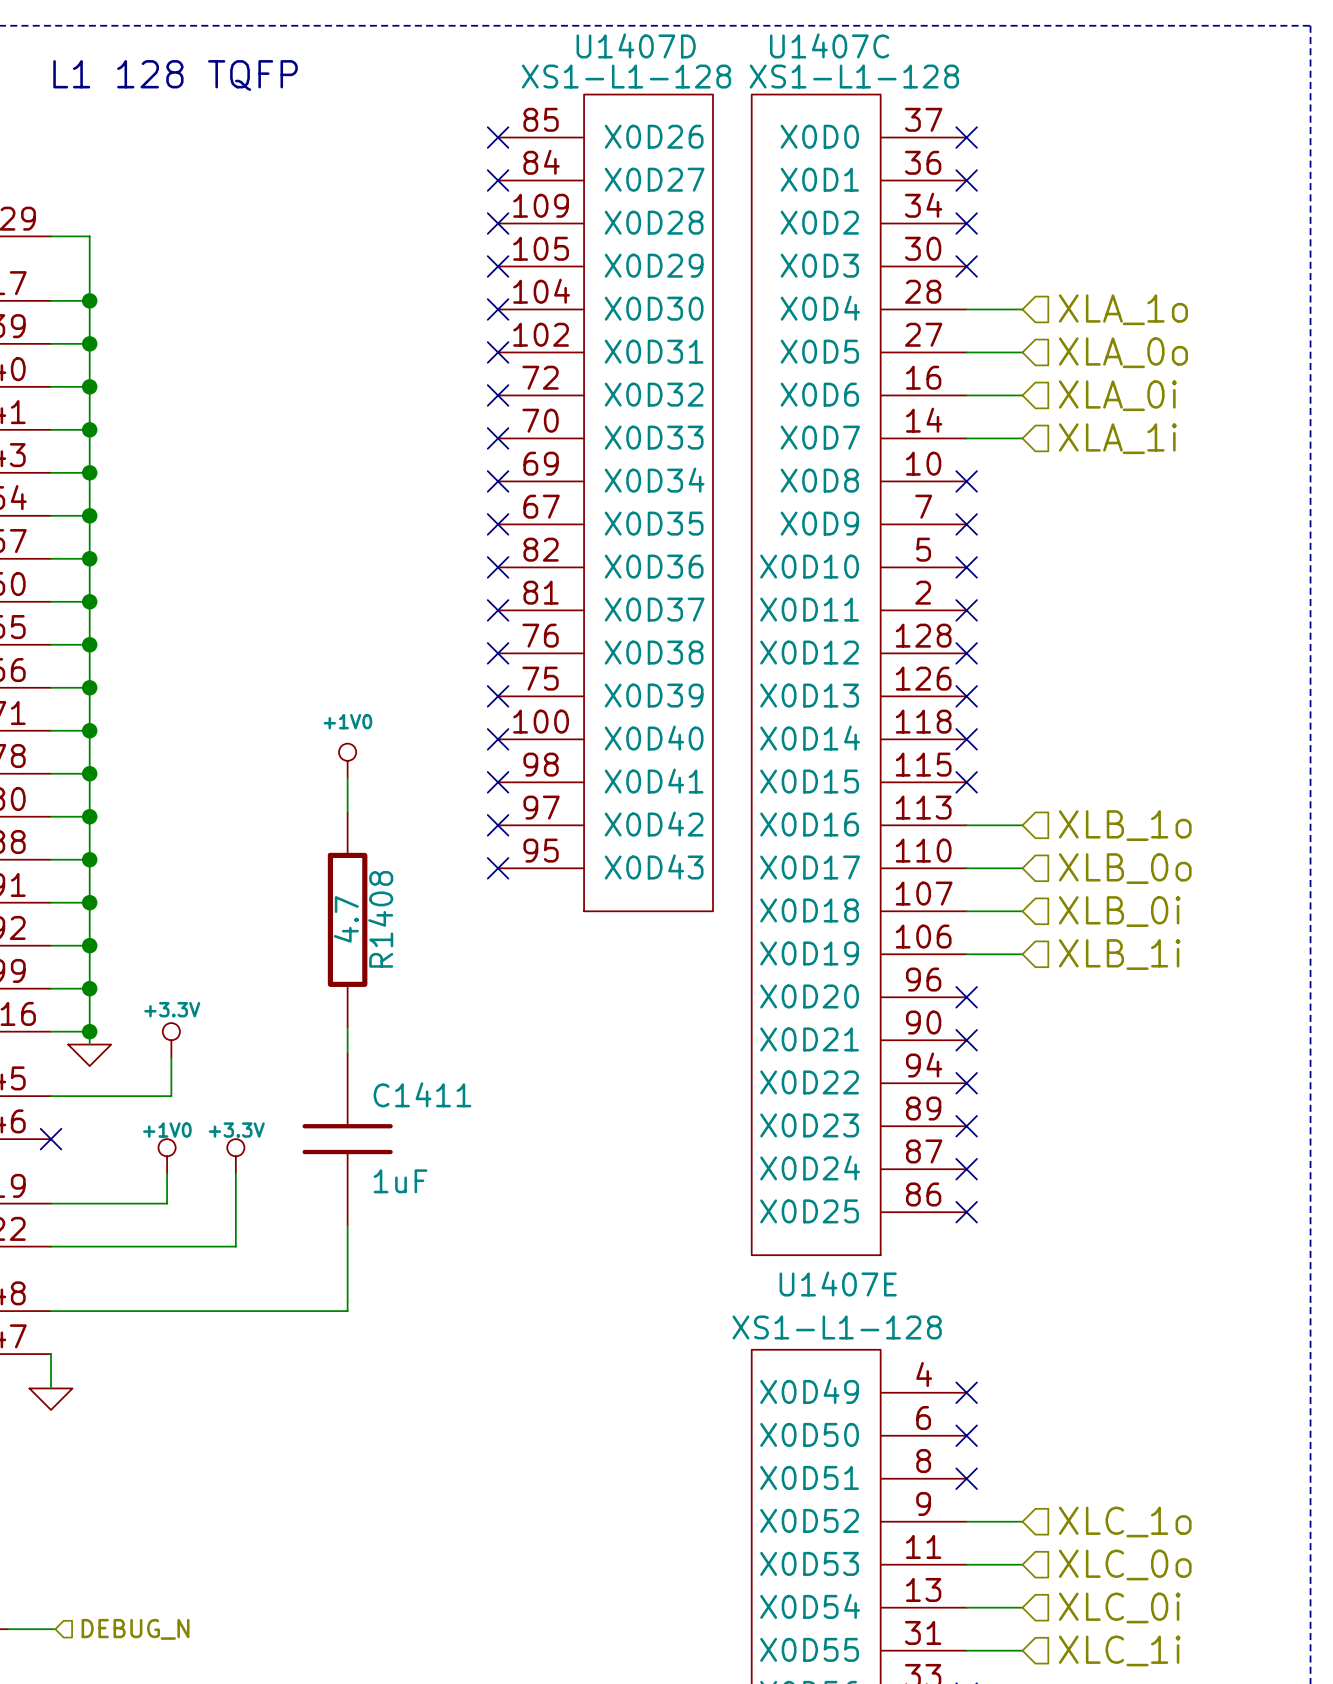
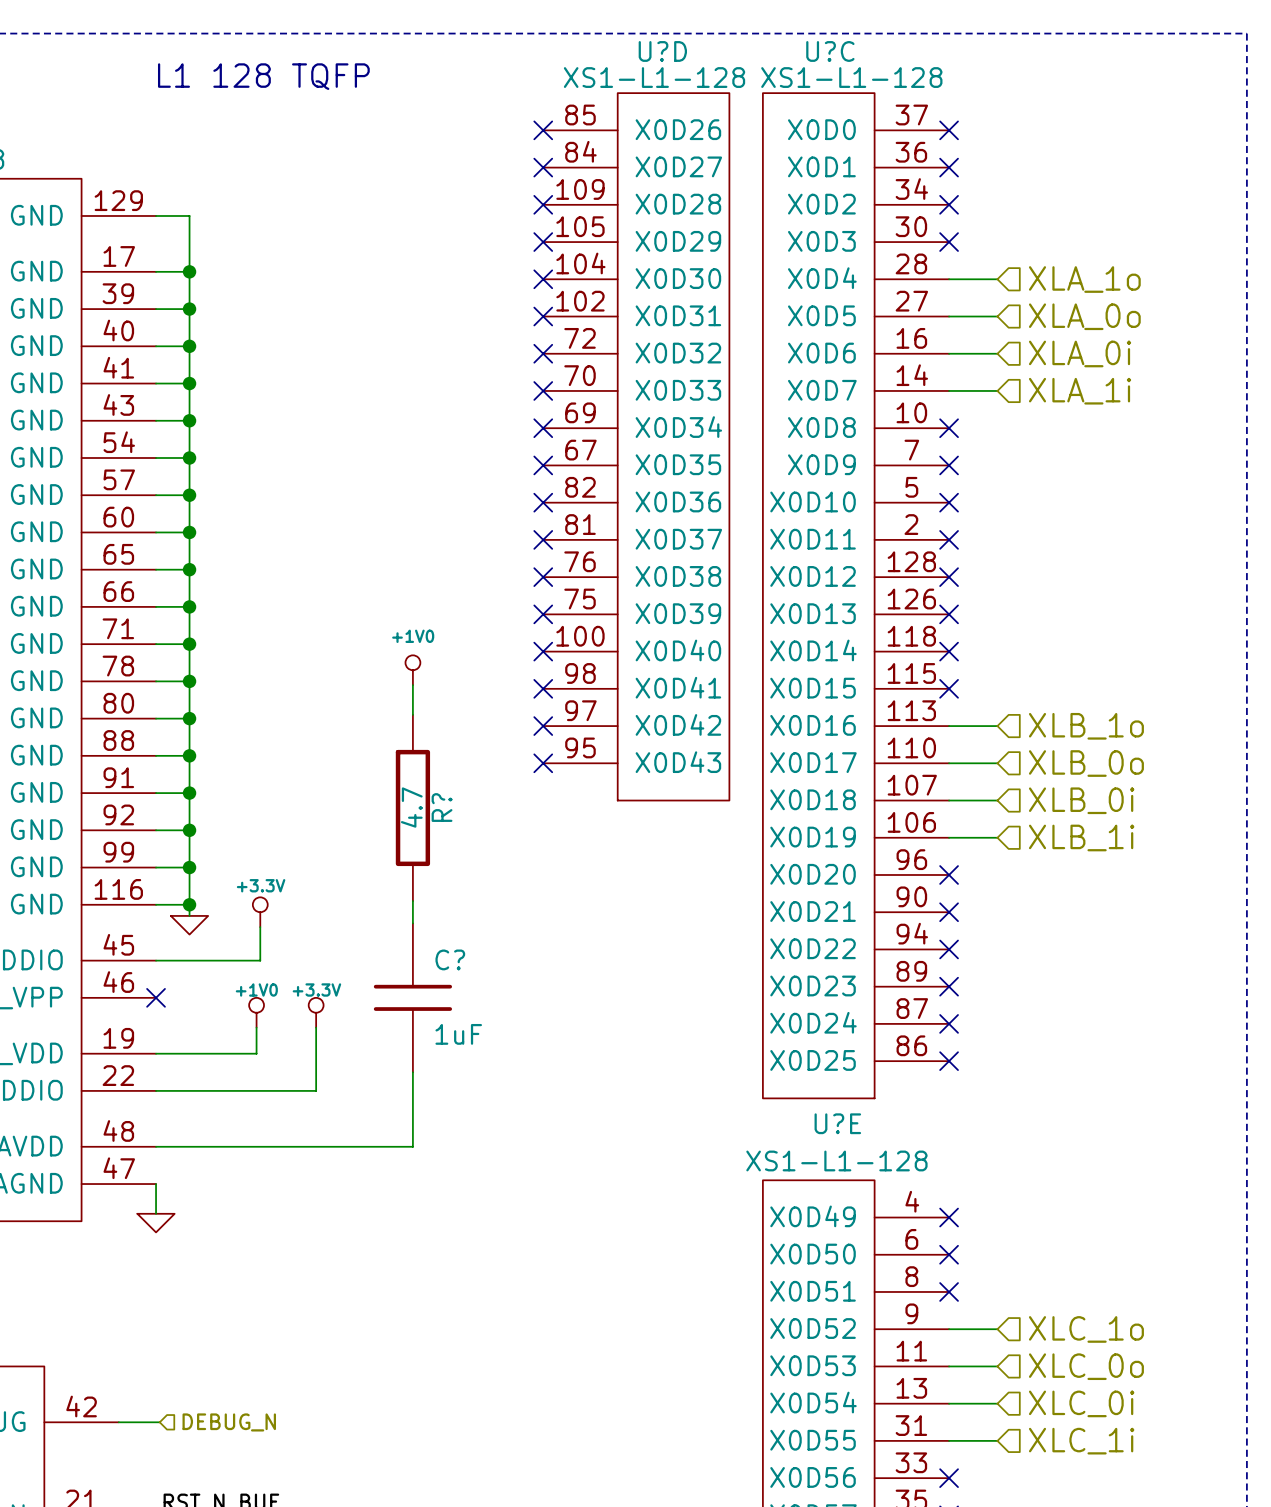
U1407D name: U1407D (636, 45) -> U?D (662, 51)
U1407C name: U1407C (829, 45) -> U?C (830, 51)
R1408 name: R1408 (380, 919) -> R? (442, 807)
C1411 name: C1411 (422, 1094) -> C? (450, 959)
U1407E name: U1407E (838, 1283) -> U?E (837, 1123)

